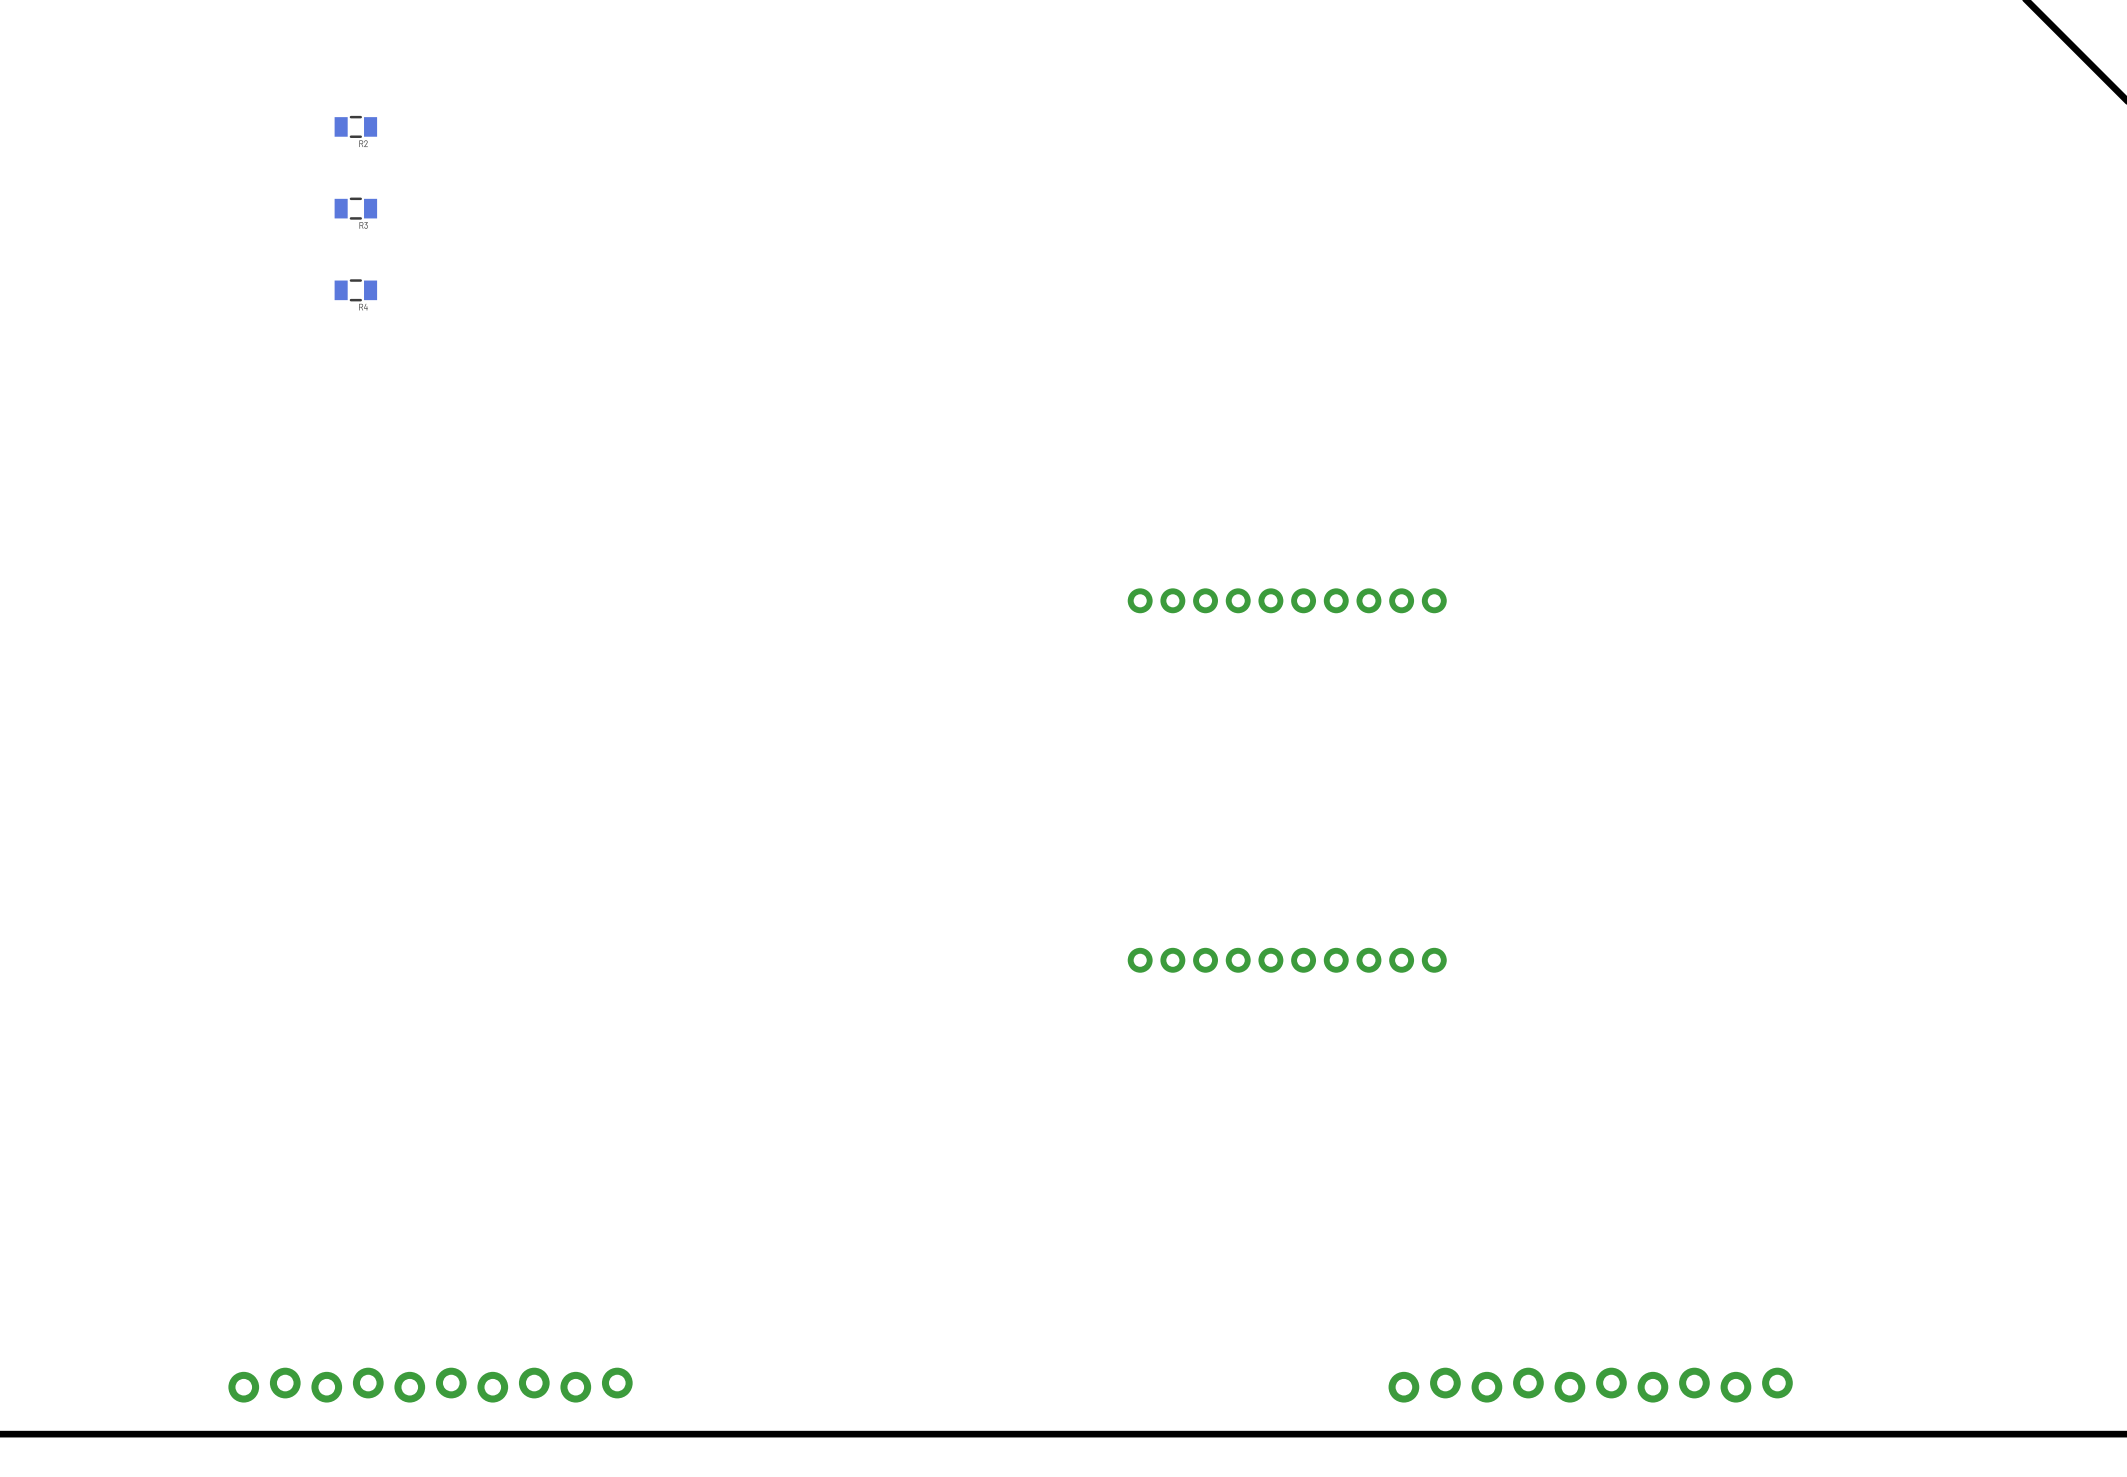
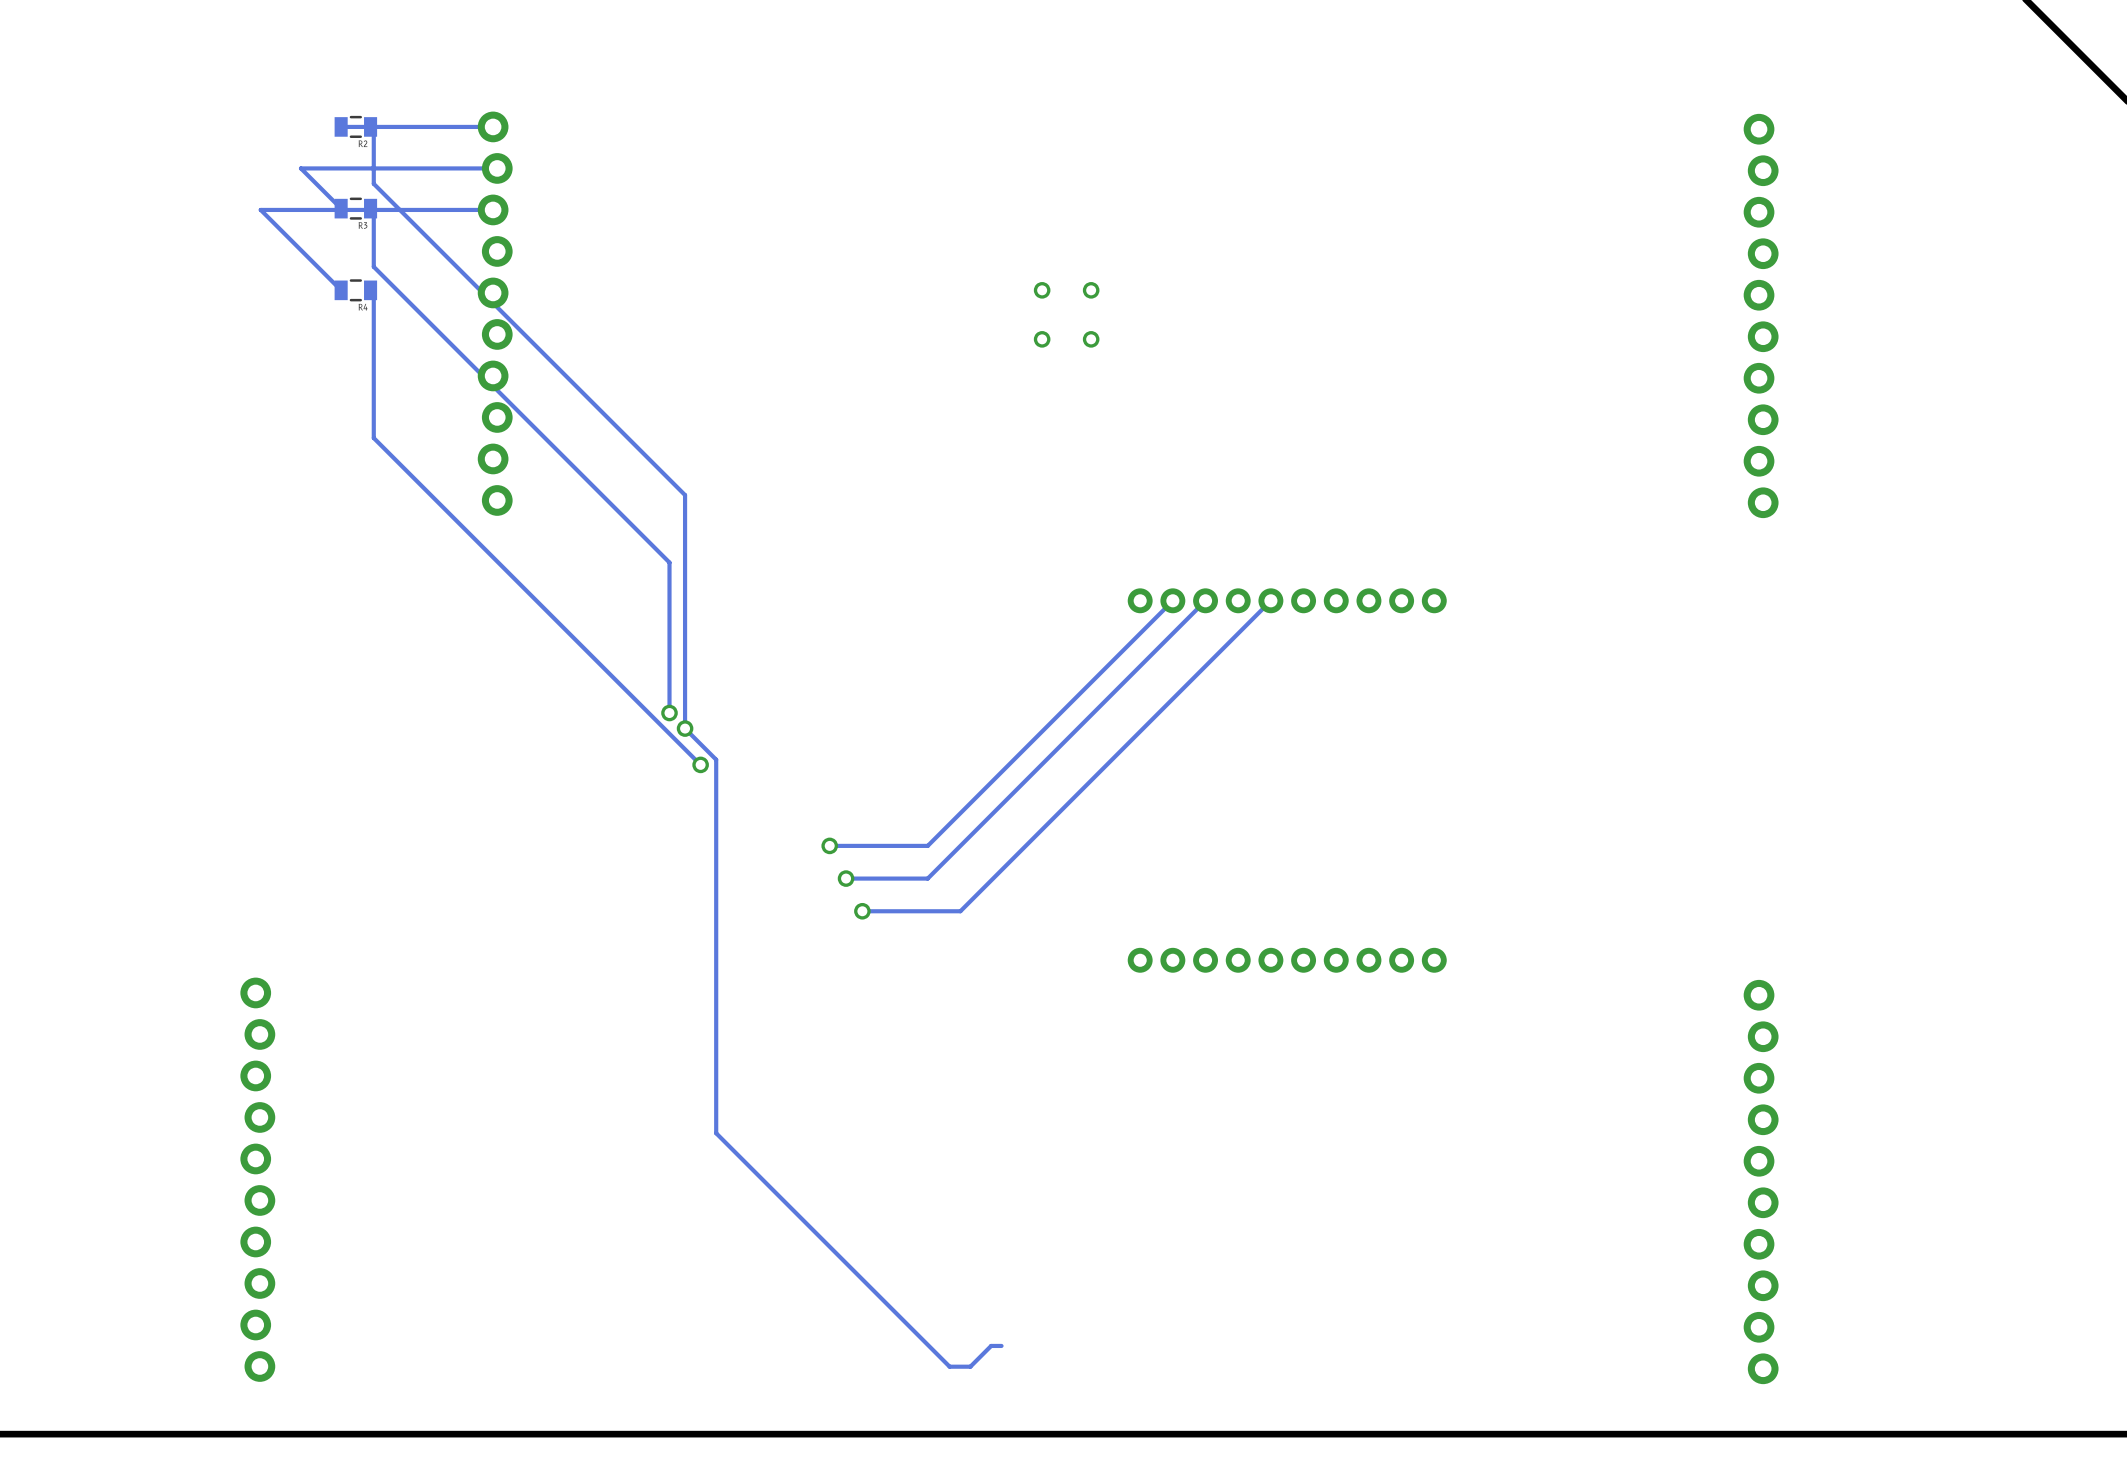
track: none -> (370, 126) (373, 131) (373, 183) (685, 495) (685, 728) (716, 759) (716, 1133) (949, 1366) (970, 1366) (991, 1345) (1001, 1345)
track: none -> (493, 126) (341, 126)
track: none -> (497, 168) (300, 168) (341, 208)
track: none -> (370, 208) (373, 209) (373, 266) (669, 562) (669, 713)
track: none -> (493, 209) (260, 209) (341, 290)
track: none -> (370, 290) (373, 292) (373, 438) (700, 764)
via: none -> (1042, 290)
via: none -> (1091, 290)
part: none -> (495, 313)
part: none -> (1761, 315)
via: none -> (1042, 339)
via: none -> (1091, 339)
track: none -> (1172, 600) (927, 845) (829, 845)
track: none -> (1205, 600) (927, 878) (846, 878)
track: none -> (1270, 600) (960, 911) (862, 911)
via: none -> (669, 713)
via: none -> (685, 728)
via: none -> (700, 764)
via: none -> (829, 845)
via: none -> (846, 878)
via: none -> (862, 911)
part rotation: 0° (430, 1385) -> 90° clockwise (257, 1179)
part position: (430, 1385) -> (257, 1179)
part rotation: 0° (1590, 1385) -> 90° clockwise (1761, 1182)
part position: (1590, 1385) -> (1761, 1182)

